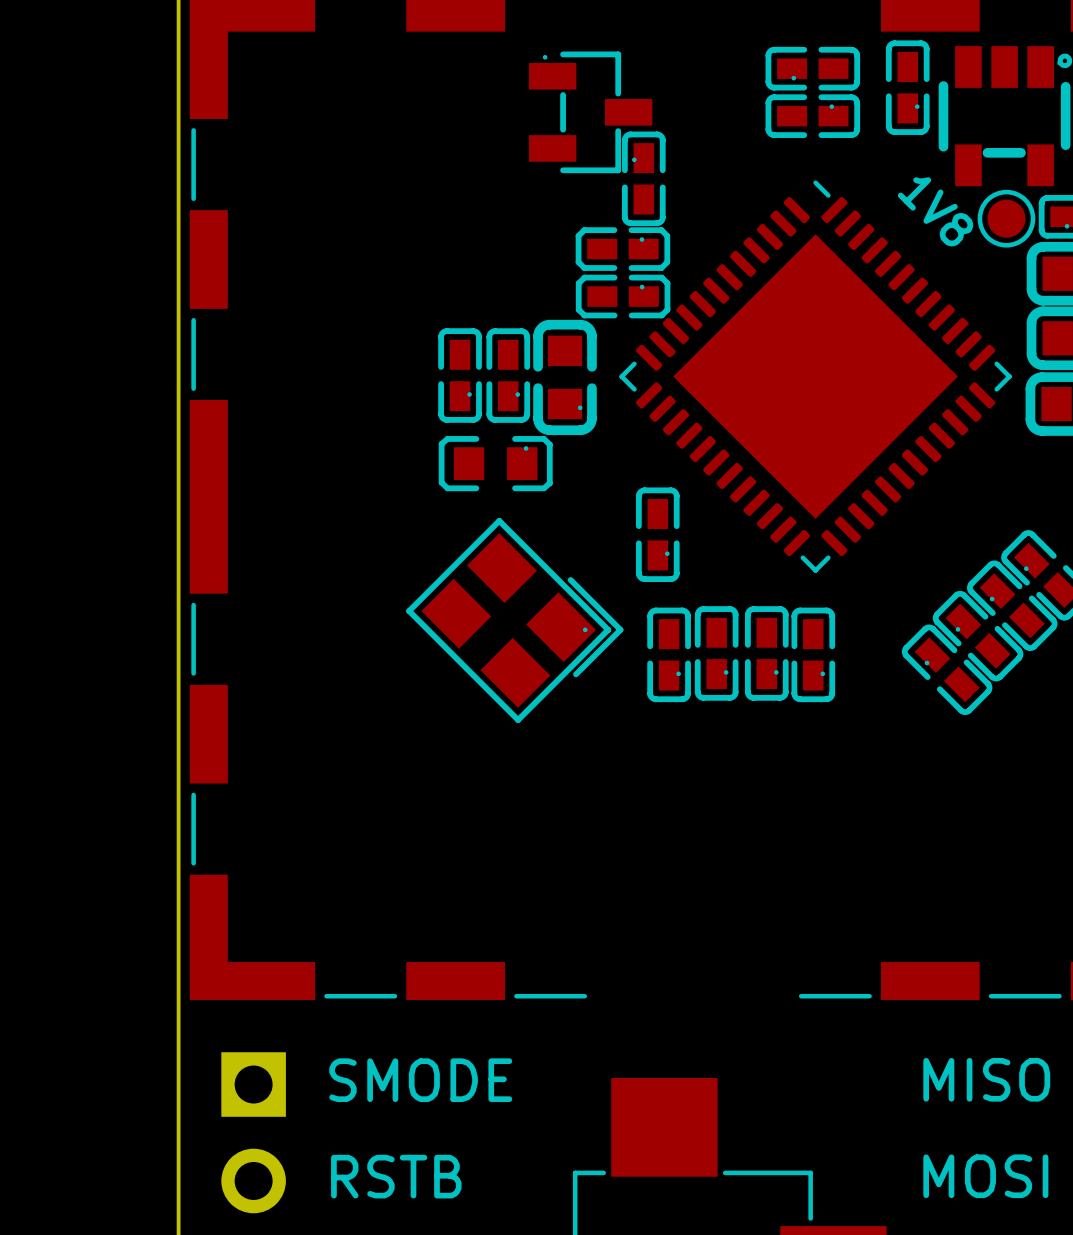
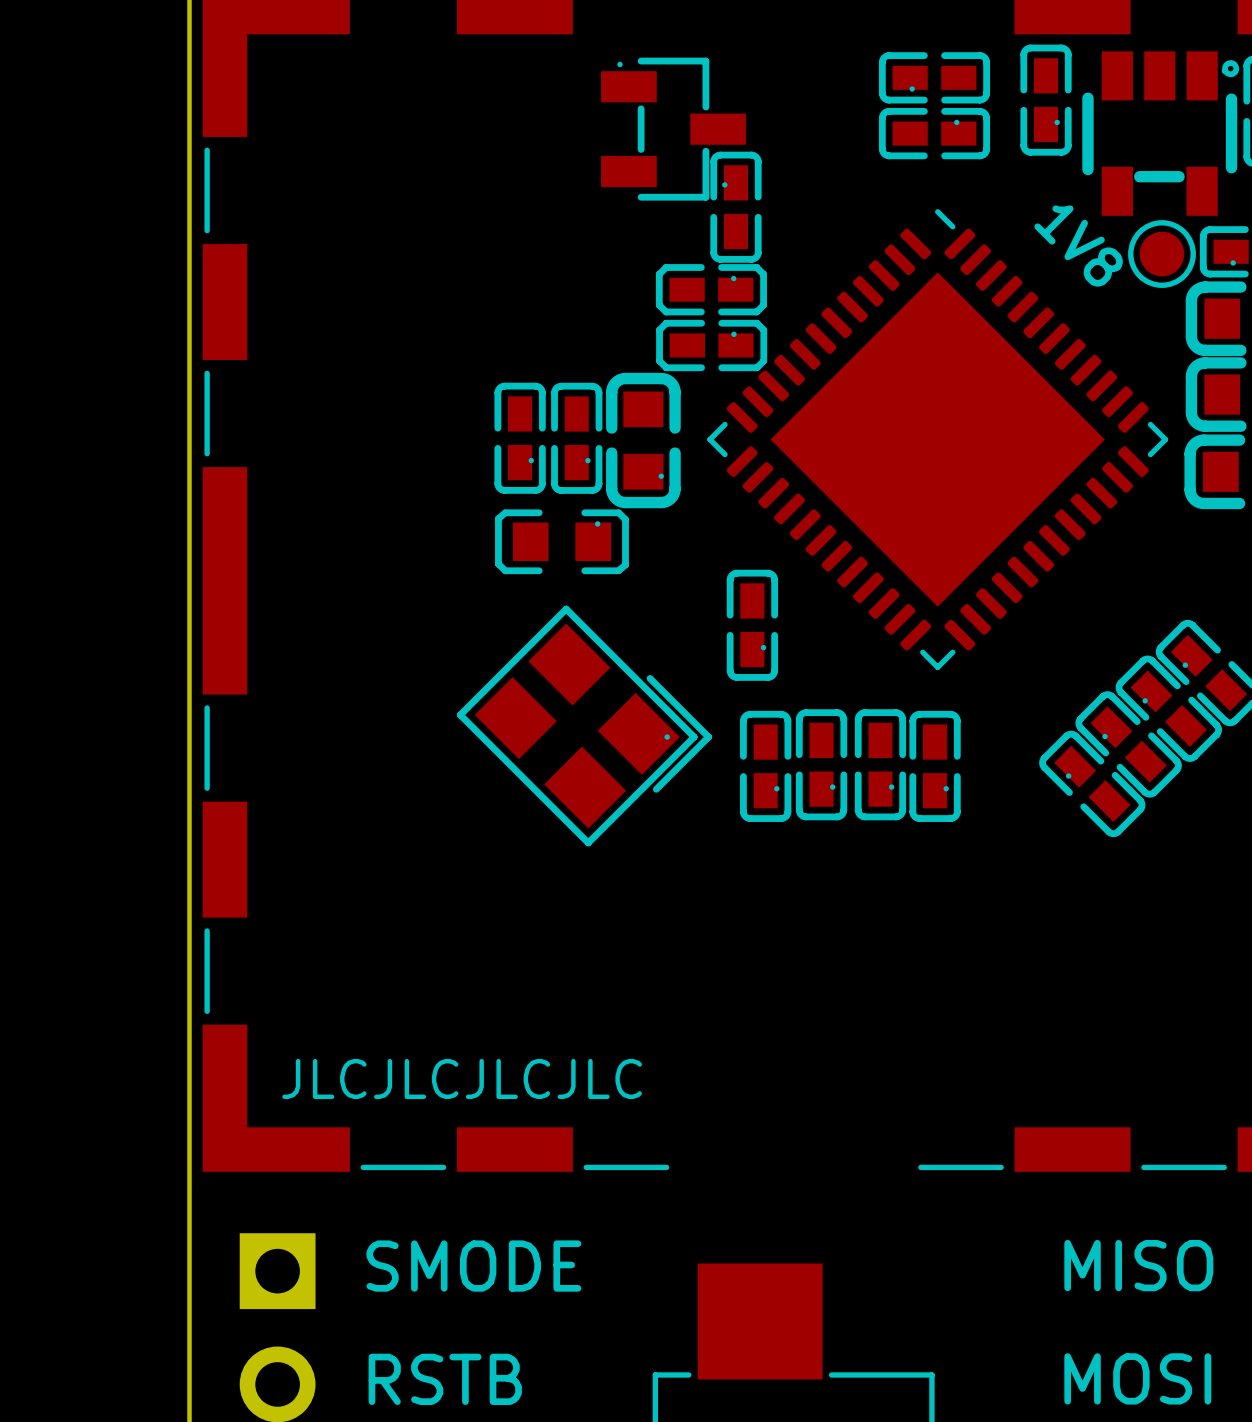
text: none -> JLCJLCJLCJLC (462, 1078)

